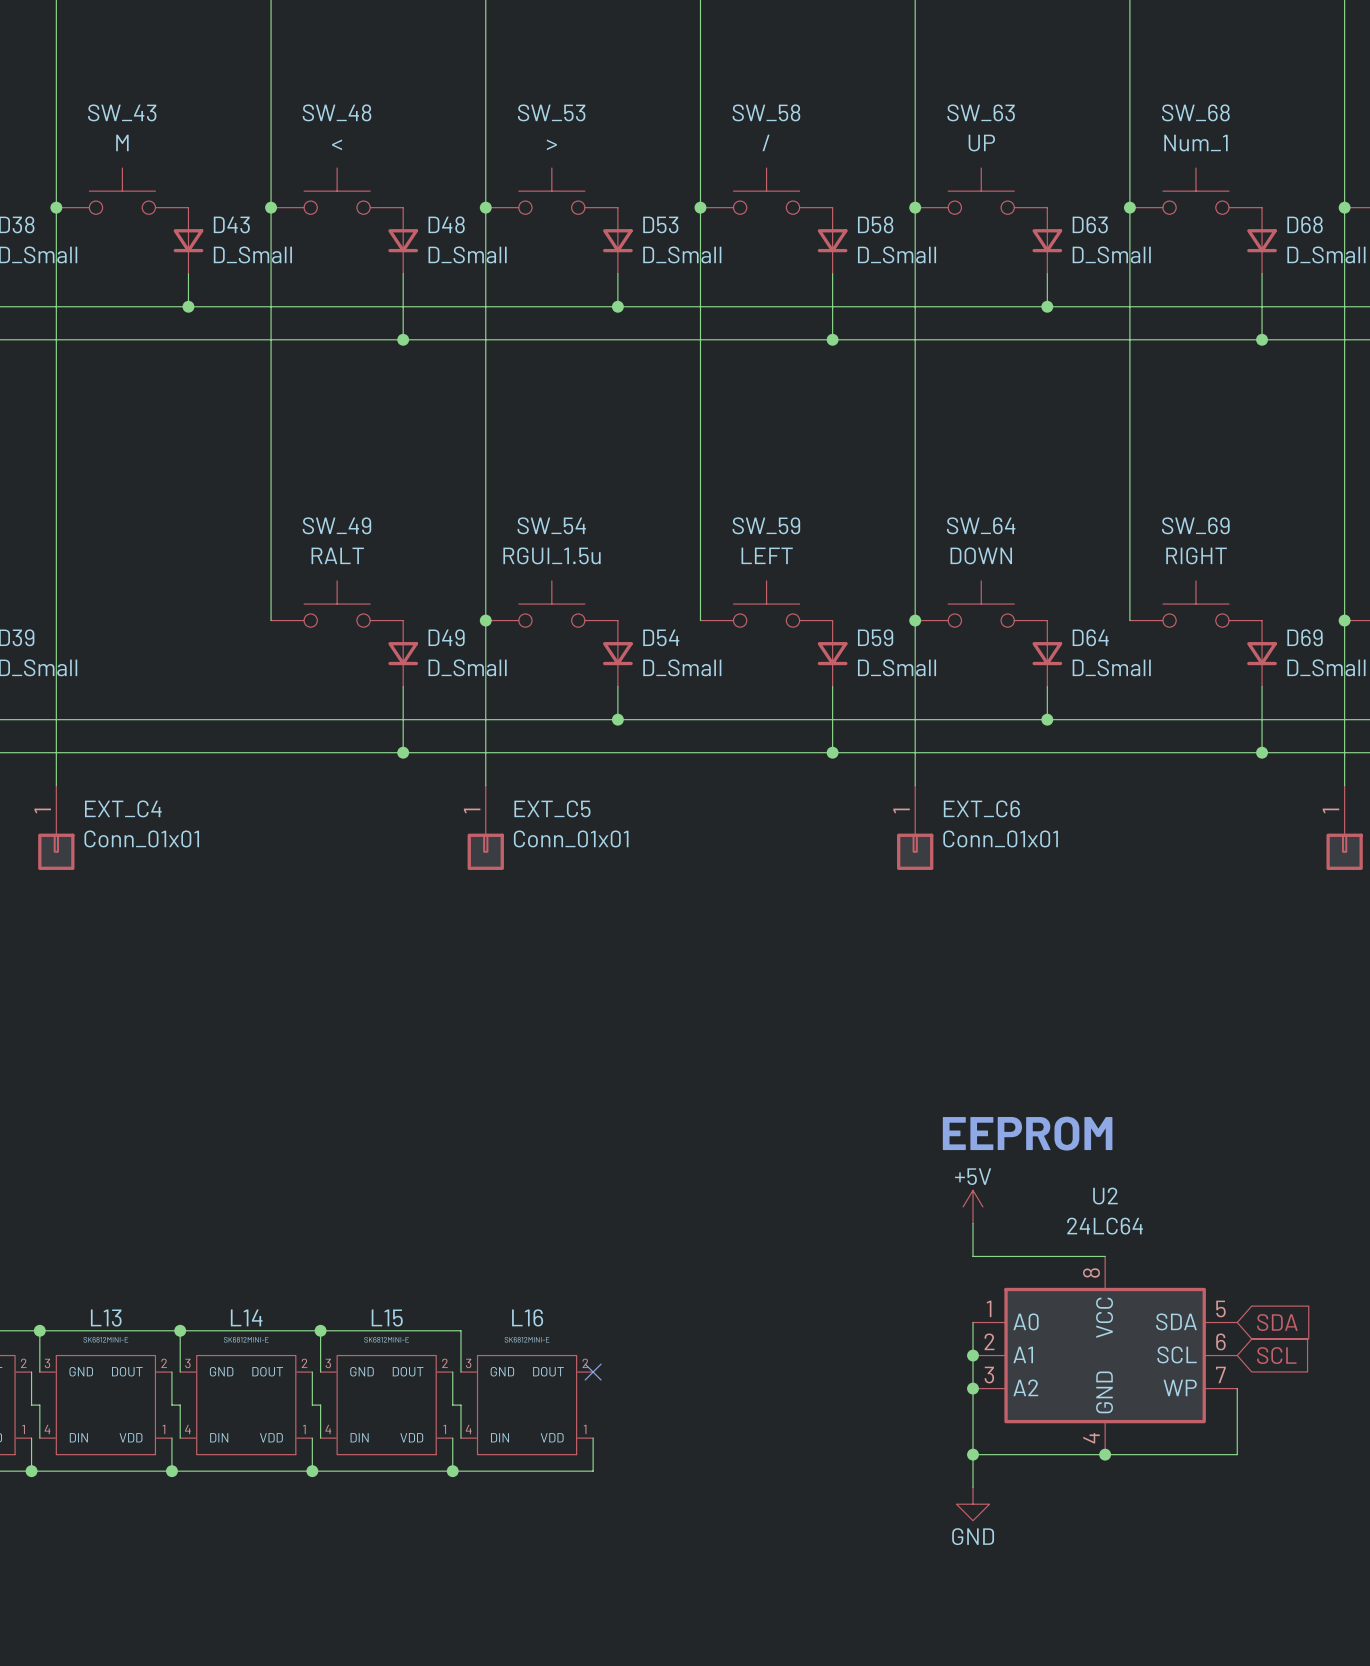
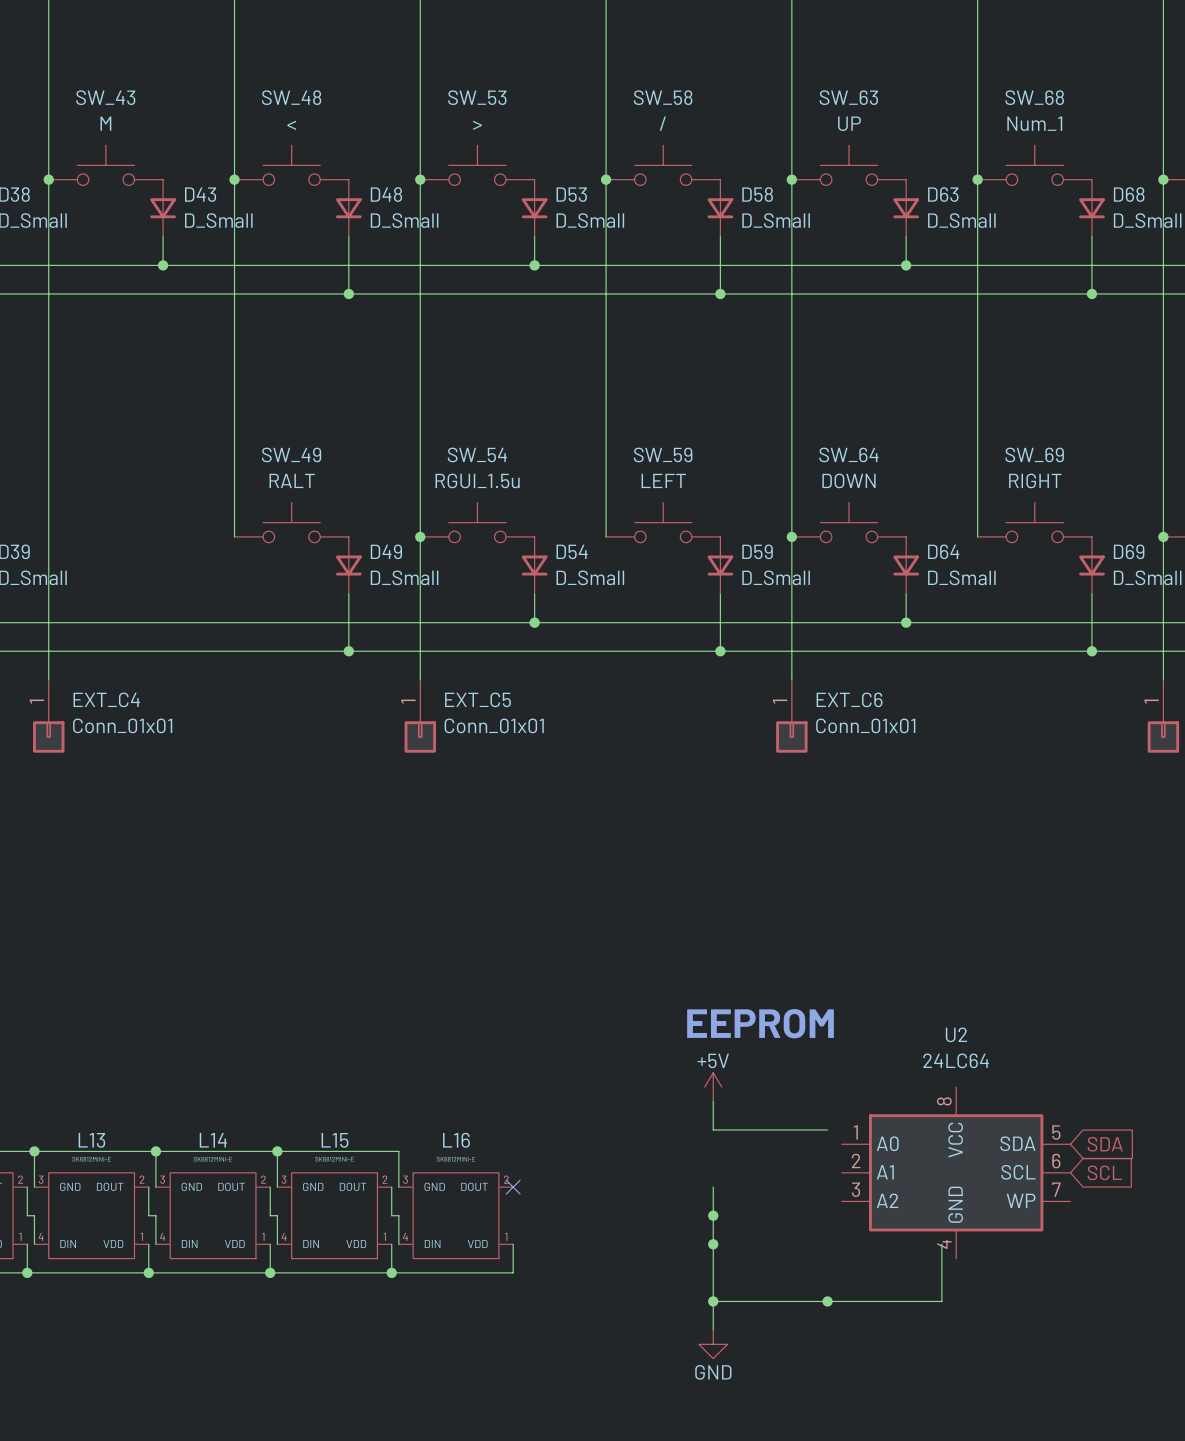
text position: EEPROM (1027, 1133) -> EEPROM (760, 1023)
power symbol position: +5V (973, 1206) -> +5V (713, 1087)
wire: (973, 1223) (973, 1256) (1105, 1256) -> (713, 1101) (713, 1129) (827, 1129)
wire: (973, 1322) (973, 1487) -> (713, 1187) (713, 1330)
junction: (973, 1355) -> none
junction: (973, 1388) -> none
wire: (1237, 1388) (1237, 1454) (973, 1454) -> (941, 1244) (941, 1301) (713, 1301)
junction: none -> (713, 1215)
junction: none -> (713, 1244)
junction position: (973, 1454) -> (827, 1301)
junction: (1105, 1454) -> none
junction: none -> (713, 1301)
power symbol position: GND (973, 1504) -> GND (713, 1344)

